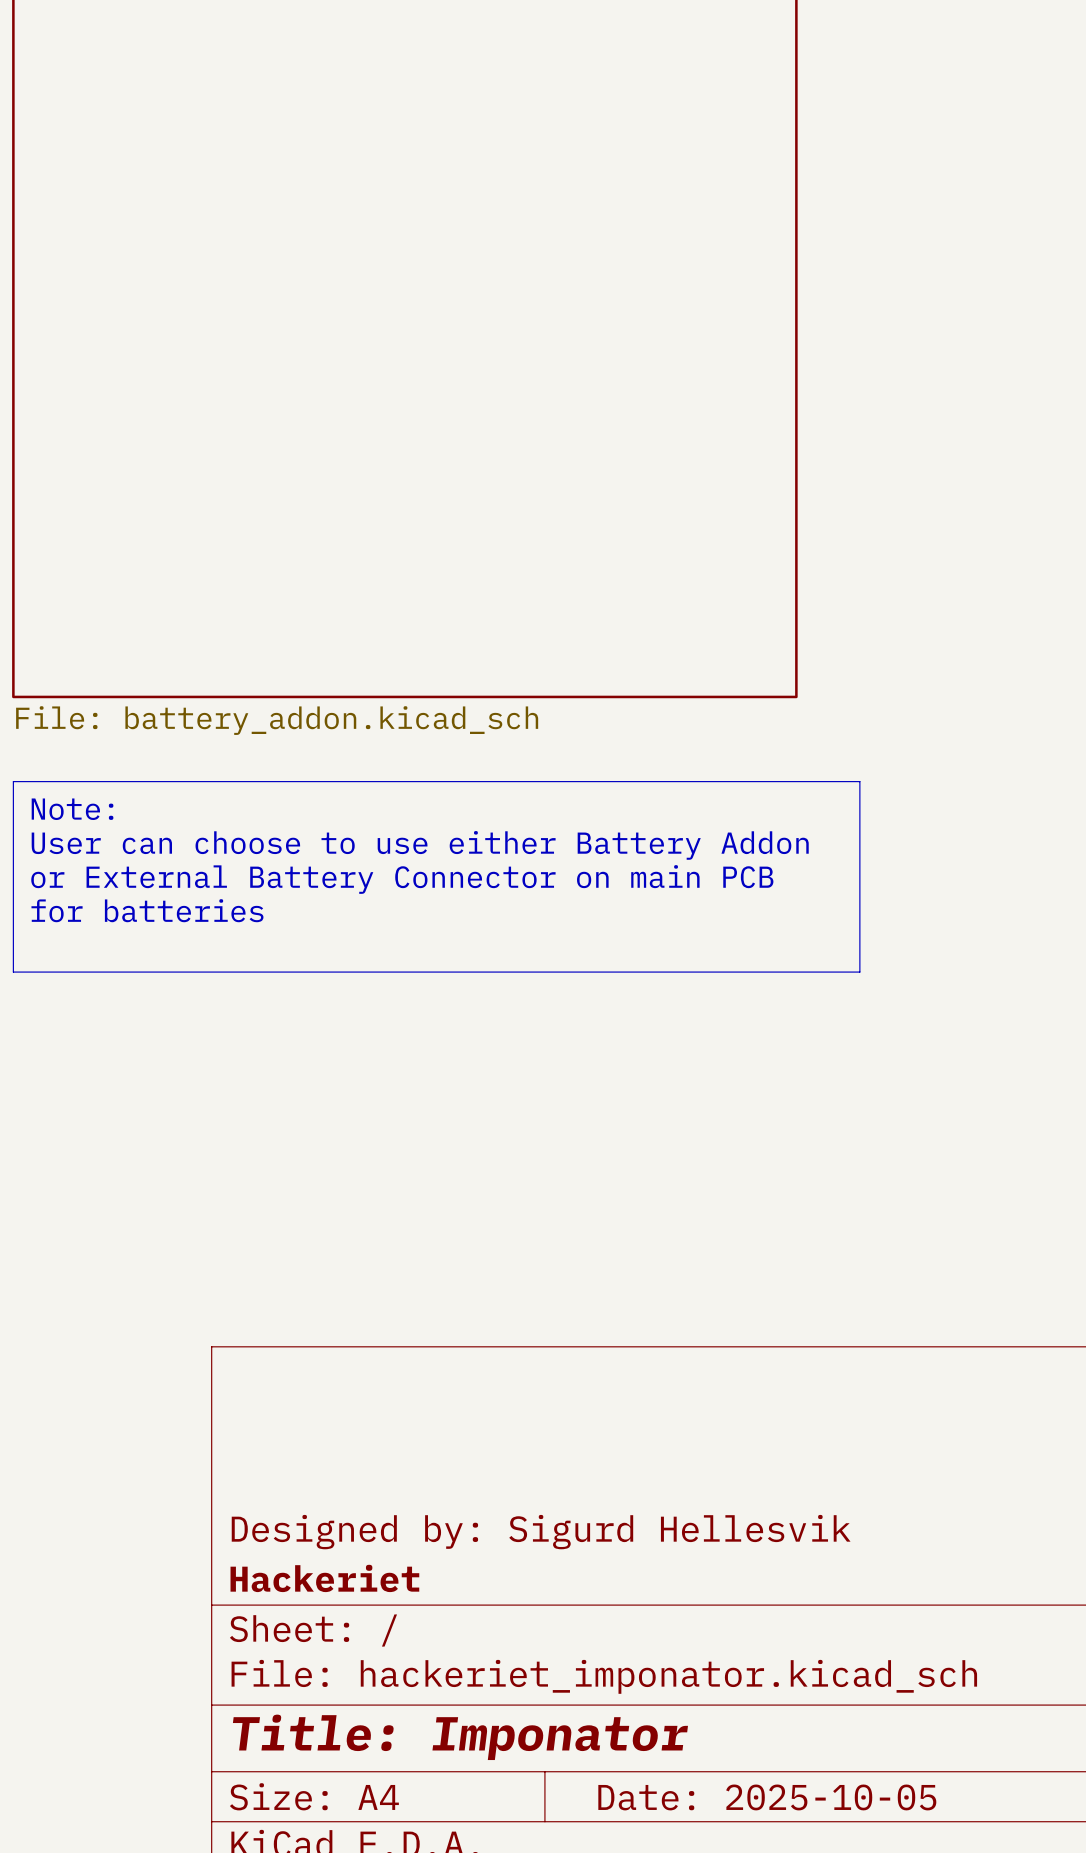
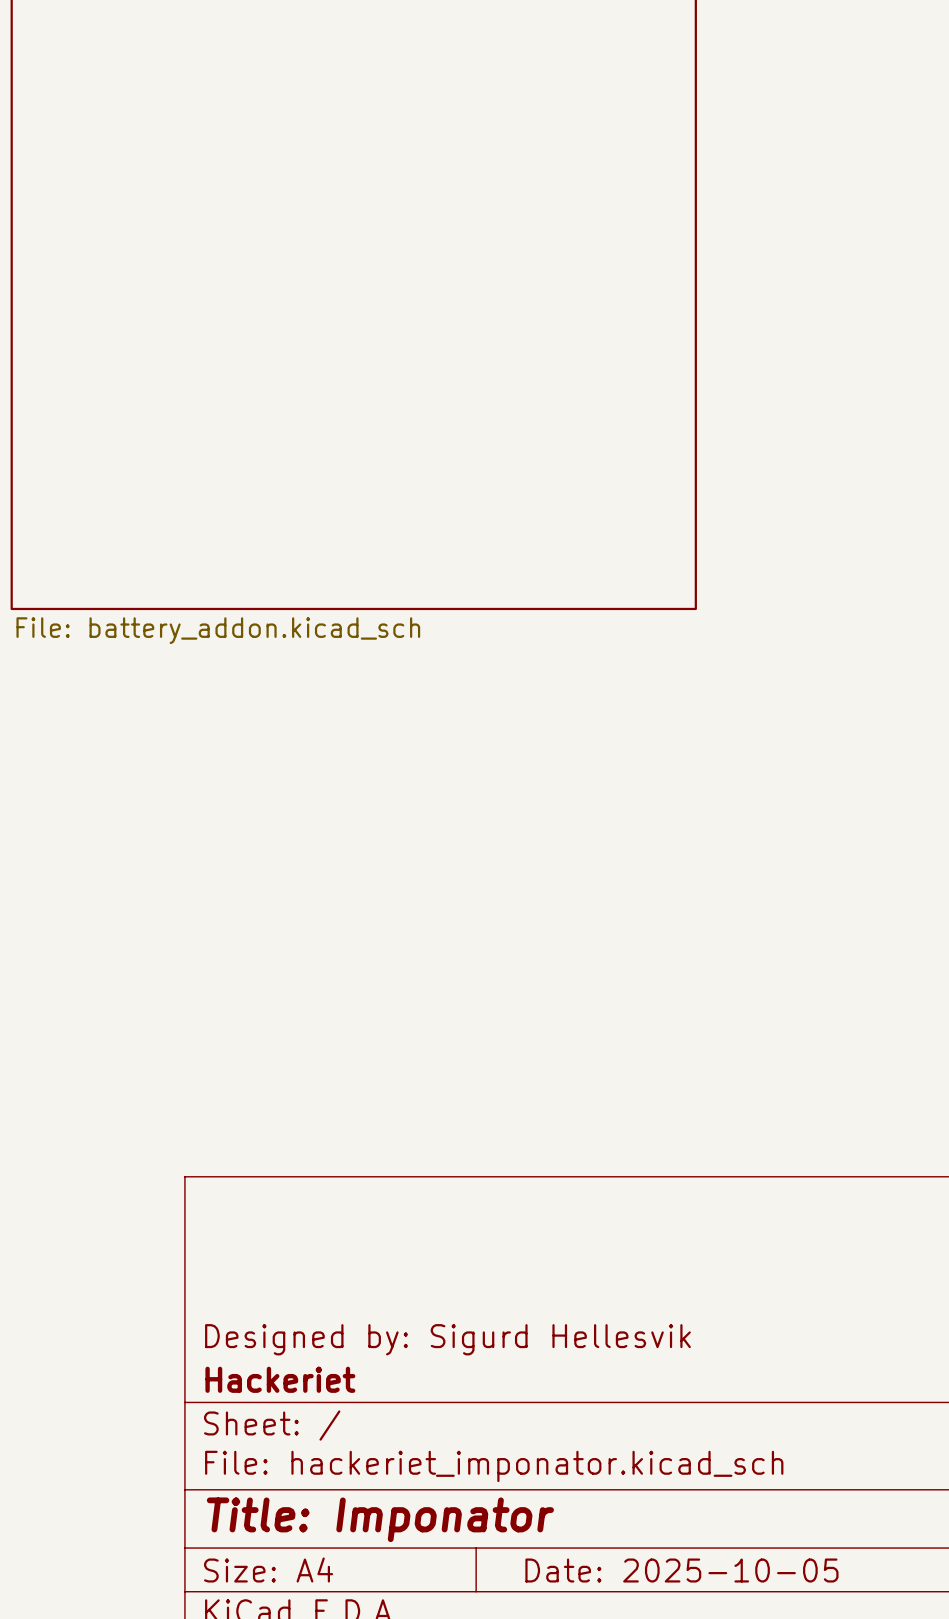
line: (13, 781) (859, 781) (859, 972) (13, 972) (13, 781) -> none
text: Note: (72, 809) -> none
text: User can choose to use either Battery Addon (420, 845) -> none
text: or External Battery Connector on main PCB (402, 879) -> none
text: for batteries (147, 910) -> none

